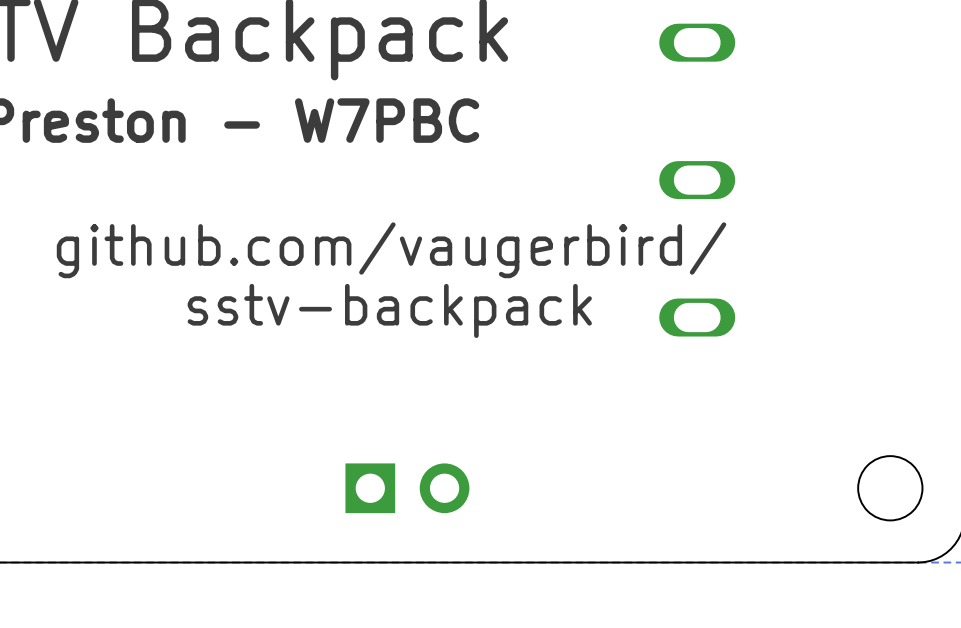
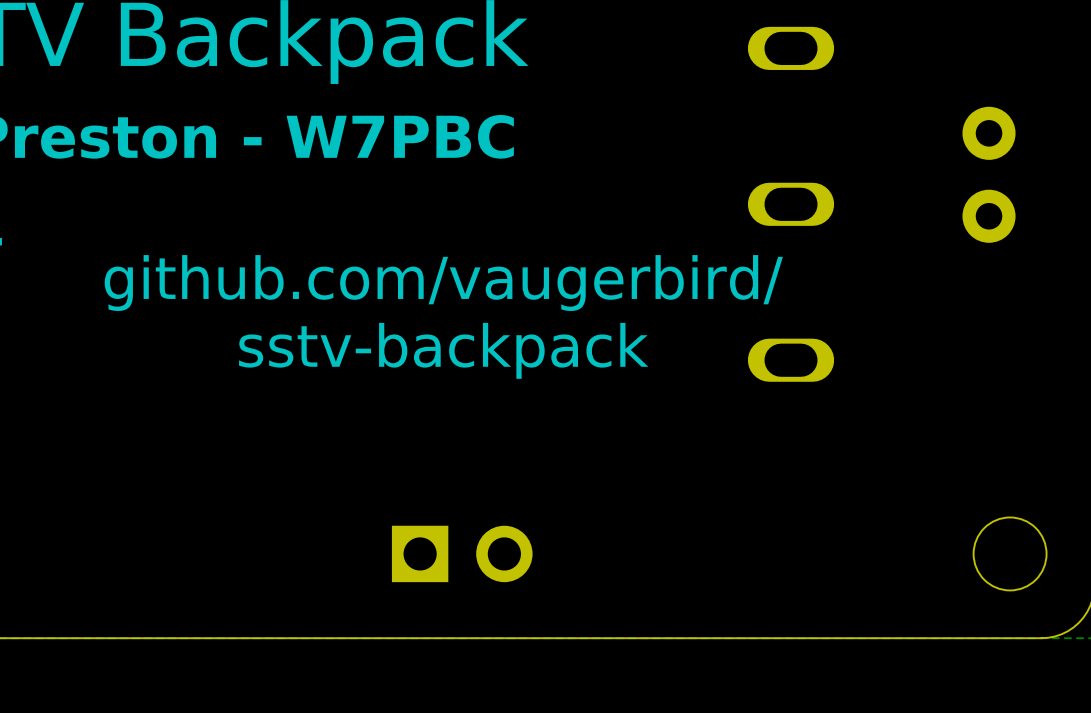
part: none -> (989, 174)

